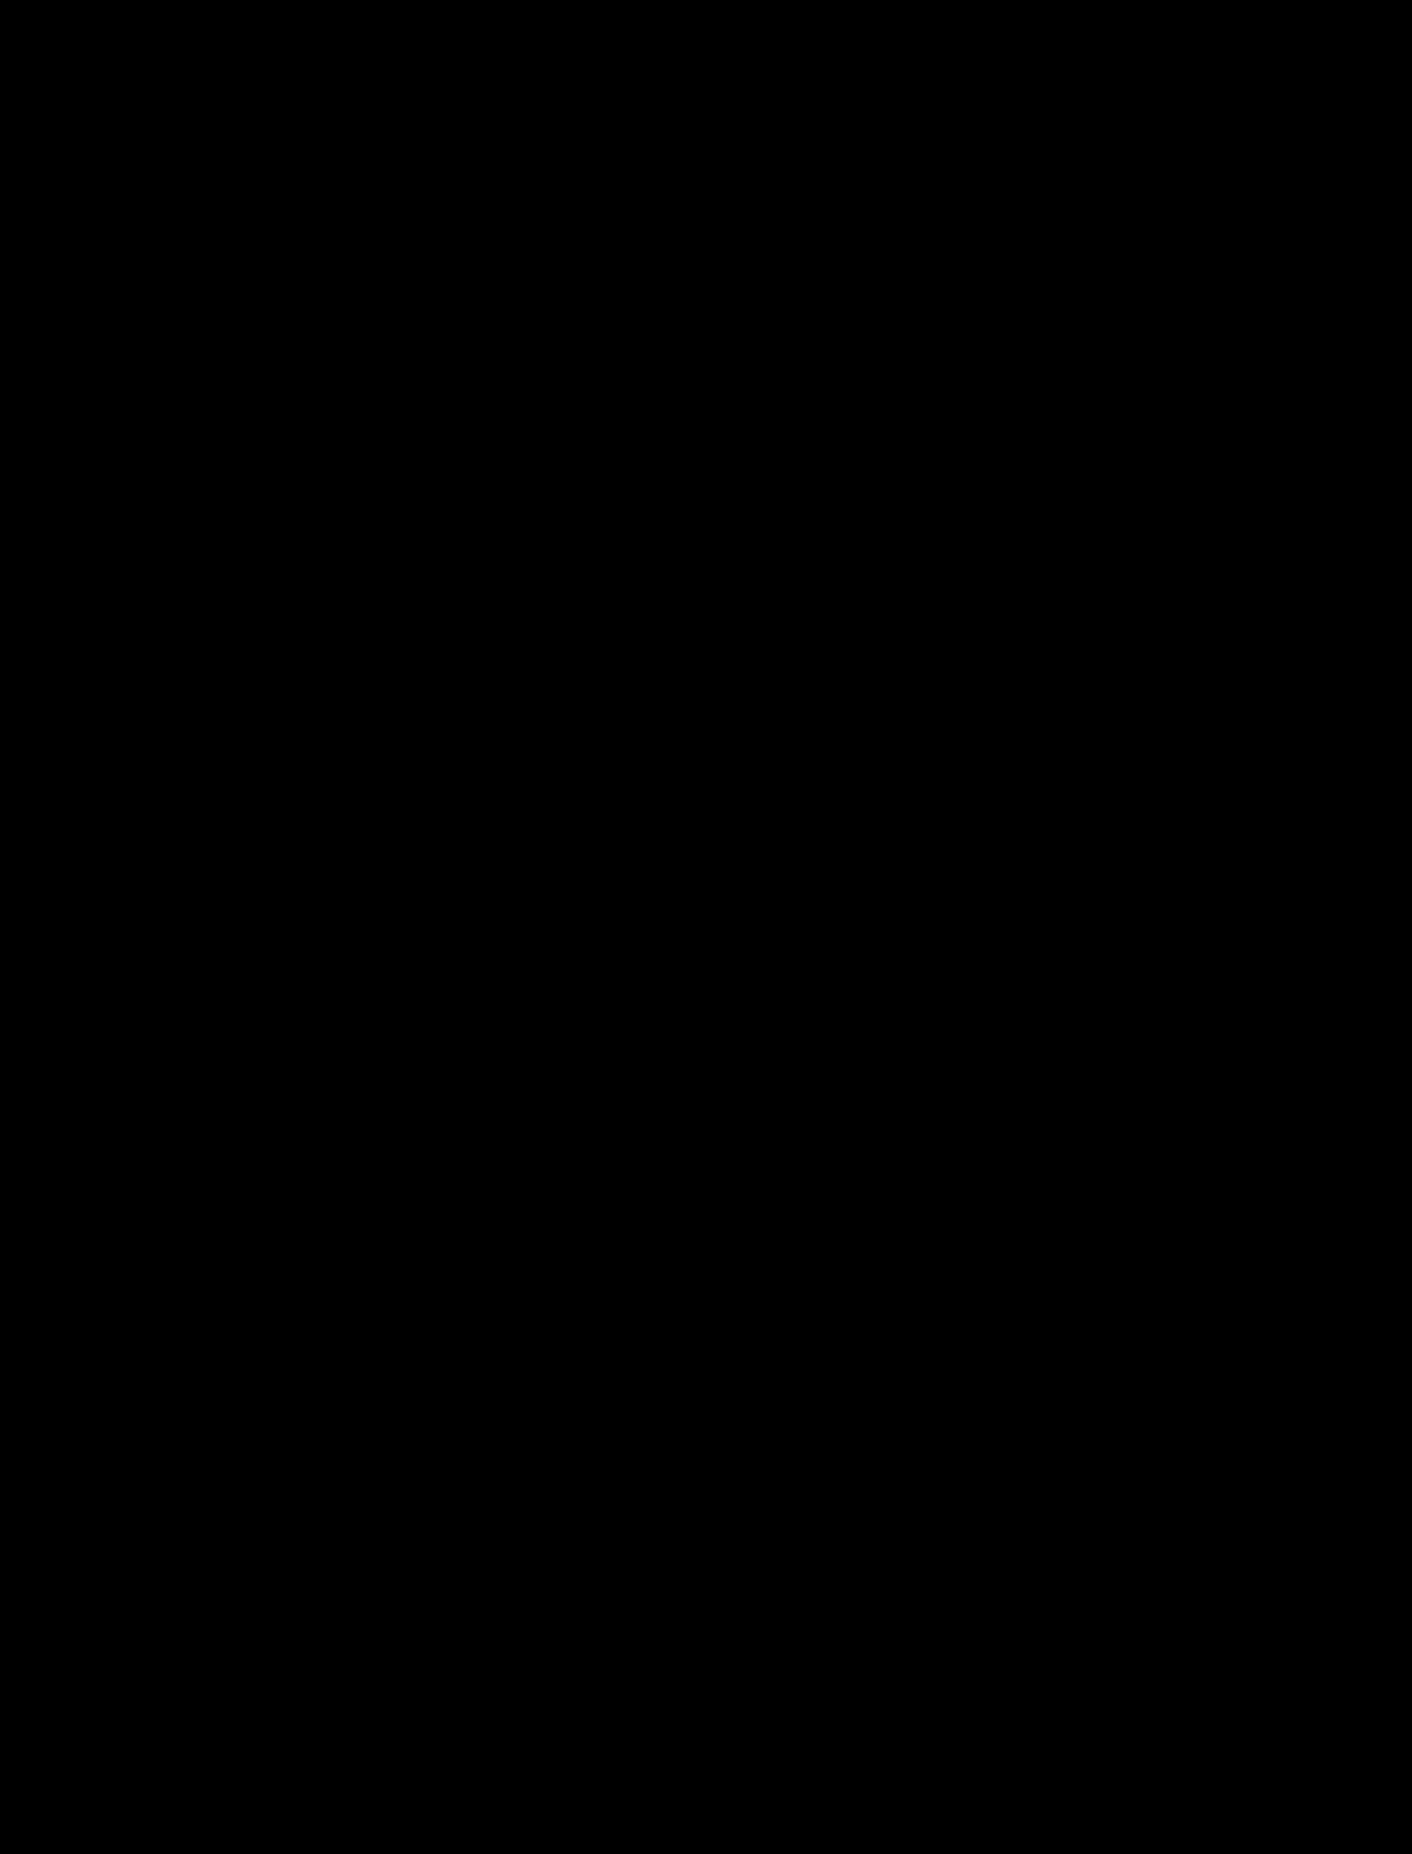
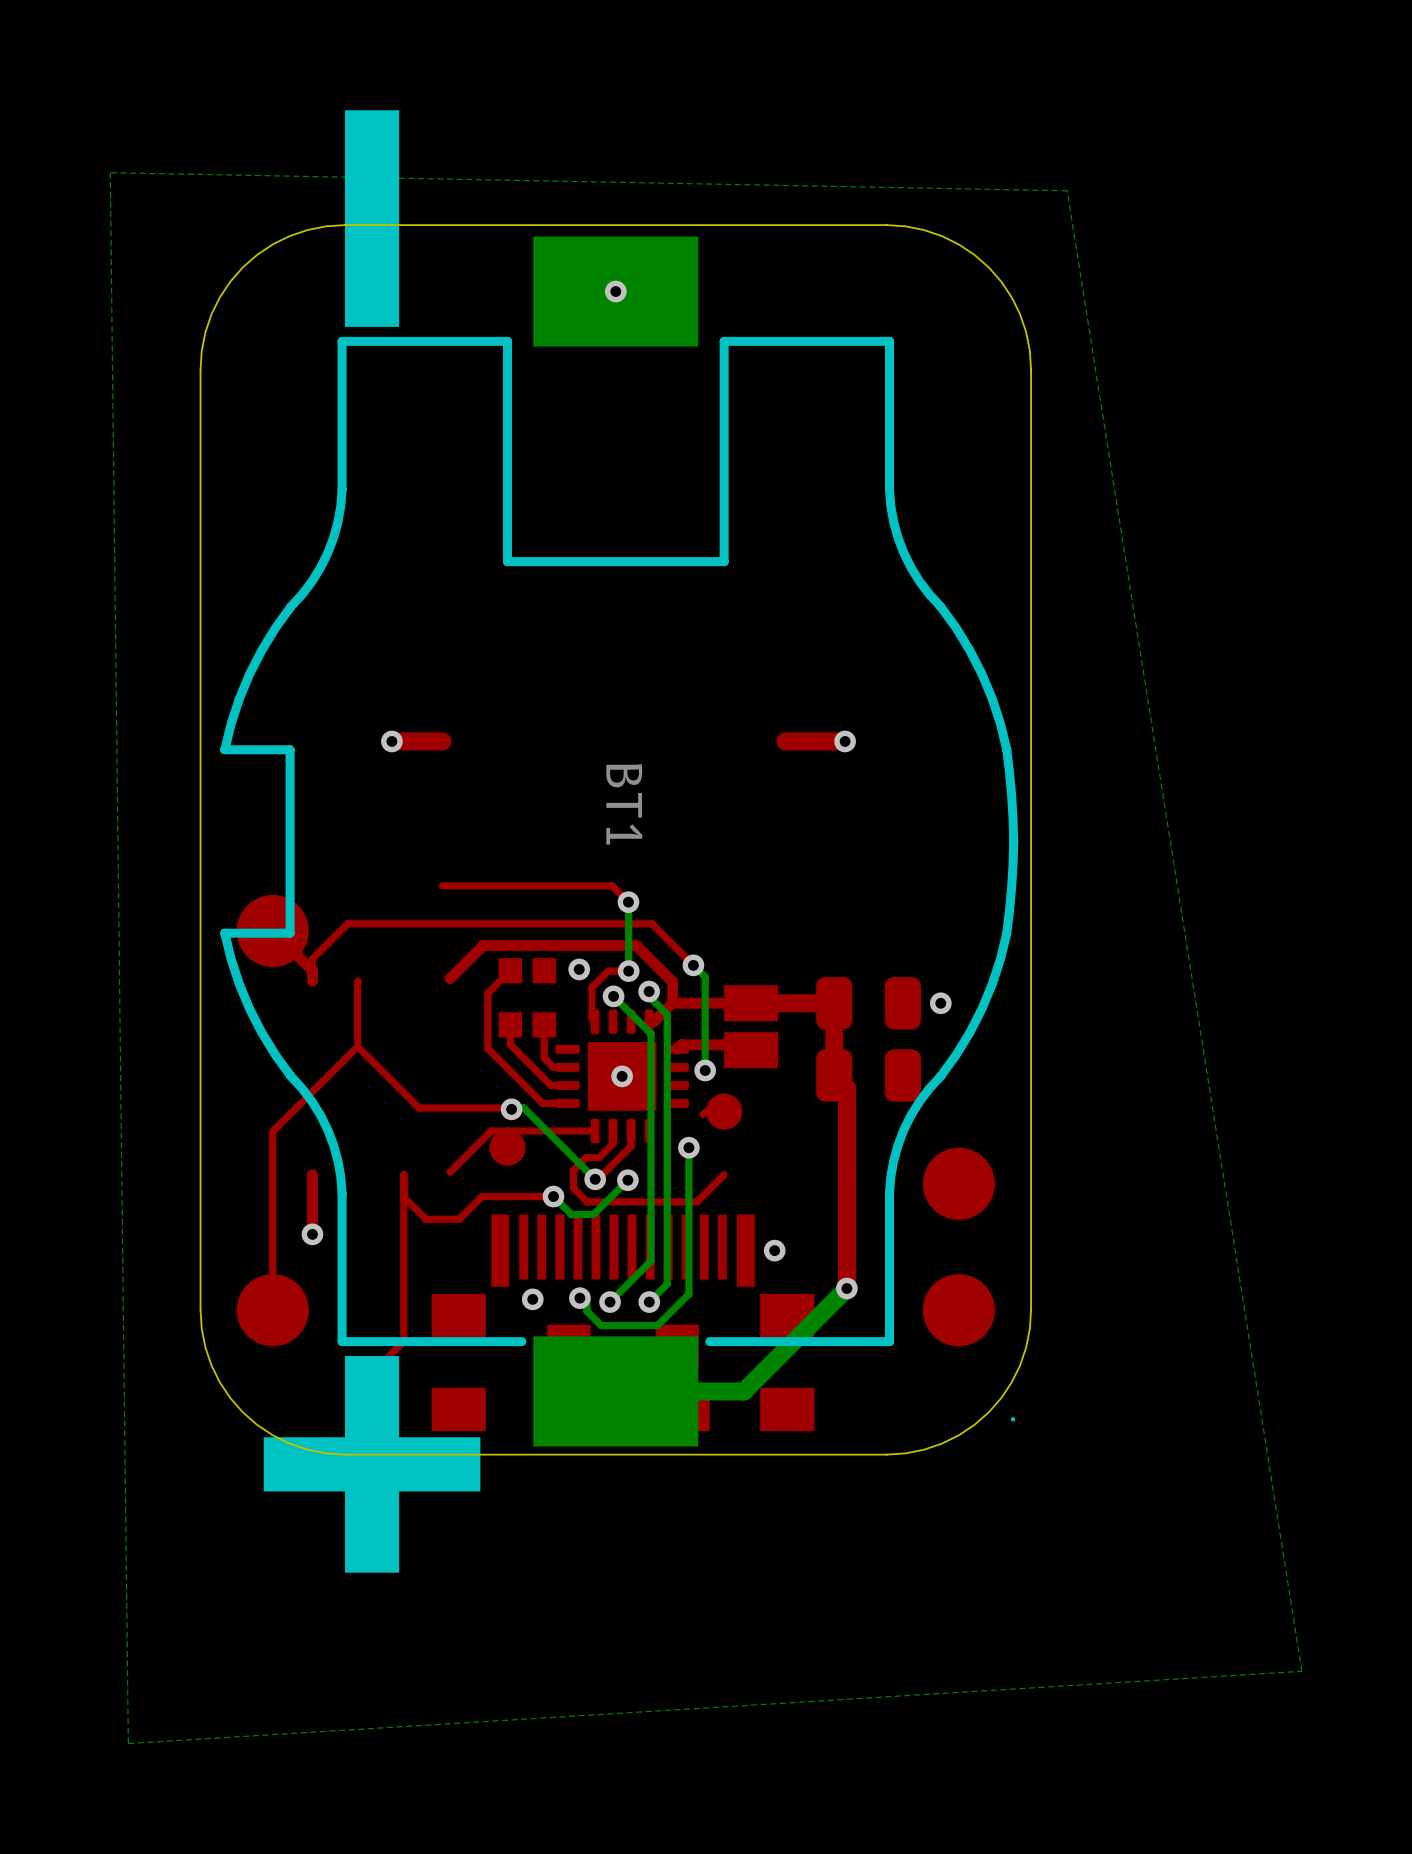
bottom zone outline: none -> (110, 172) (1067, 190) (1301, 1671) (128, 1743) (110, 172)
board edge: none -> (886, 225) (326, 226) (307, 230) (272, 244) (242, 267) (219, 297) (205, 332) (200, 369) (200, 1310) (205, 1347) (219, 1382) (242, 1412) (272, 1435) (307, 1449) (344, 1454) (905, 1453) (924, 1449) (958, 1435) (988, 1412) (1011, 1382) (1026, 1347) (1031, 1310) (1029, 350) (1020, 314) (1011, 297) (988, 267) (974, 254) (941, 236) (924, 230) (886, 225)
via: none -> (615, 291)
via: none -> (391, 741)
top track: none -> (442, 741) (391, 741)
top track: none -> (845, 741) (785, 741)
via: none -> (845, 741)
BT1: none -> (619, 841)
top track: none -> (442, 885) (612, 885) (628, 902)
bottom track: none -> (628, 902) (628, 971)
via: none -> (628, 902)
top track: none -> (272, 931) (312, 970) (312, 981) (312, 958) (347, 923) (651, 923) (693, 965)
part: none -> (272, 931)
bottom track: none -> (693, 965) (705, 977) (705, 1070)
via: none -> (693, 965)
via: none -> (579, 969)
top track: none -> (628, 971) (608, 971) (591, 987) (591, 1018) (595, 1021)
via: none -> (628, 971)
top track: none -> (510, 977) (510, 970) (487, 993) (487, 1048) (542, 1103) (567, 1103)
top track: none -> (450, 978) (483, 945) (636, 945) (672, 981) (672, 1002) (653, 1021) (649, 1021)
top track: none -> (358, 981) (357, 1046)
bottom track: none -> (649, 991) (649, 996) (667, 1014) (667, 1284) (649, 1302)
via: none -> (649, 991)
bottom track: none -> (613, 996) (651, 1033) (651, 1261) (610, 1302)
via: none -> (613, 996)
part: none -> (527, 997)
top track: none -> (672, 1003) (834, 1003) (834, 1075) (846, 1088) (846, 1288)
part: none -> (868, 1003)
via: none -> (940, 1003)
top track: none -> (510, 1024) (510, 1044) (551, 1085) (567, 1085)
top track: none -> (544, 1024) (544, 1058) (553, 1067) (567, 1067)
part: none -> (751, 1026)
top track: none -> (357, 1046) (419, 1107) (511, 1109)
top track: none -> (357, 1046) (272, 1131) (272, 1310)
top track: none -> (676, 1049) (681, 1044) (745, 1044) (751, 1050)
via: none -> (705, 1070)
part: none -> (868, 1075)
part: none -> (622, 1076)
via: none -> (622, 1076)
bottom track: none -> (511, 1109) (523, 1107) (595, 1179)
via: none -> (511, 1109)
top track: none -> (706, 1111) (702, 1114)
part: none -> (724, 1111)
top track: none -> (595, 1131) (491, 1131) (450, 1172)
top track: none -> (613, 1131) (613, 1143) (599, 1157) (586, 1157) (573, 1170) (573, 1188) (587, 1201) (697, 1201) (724, 1174)
top track: none -> (631, 1131) (631, 1146) (597, 1179) (595, 1179)
part: none -> (507, 1147)
bottom track: none -> (688, 1147) (688, 1294) (657, 1325) (601, 1325) (586, 1311) (586, 1296)
via: none -> (688, 1147)
top track: none -> (312, 1174) (312, 1234)
top track: none -> (403, 1174) (403, 1341) (363, 1382)
via: none -> (595, 1179)
bottom track: none -> (627, 1180) (593, 1214) (571, 1214) (553, 1196)
via: none -> (627, 1180)
part: none -> (958, 1183)
top track: none -> (553, 1196) (482, 1196) (459, 1219) (426, 1219) (403, 1197)
via: none -> (553, 1196)
via: none -> (312, 1234)
via: none -> (774, 1250)
bottom track: none -> (846, 1288) (743, 1391) (615, 1391)
via: none -> (846, 1288)
via: none -> (579, 1298)
via: none -> (532, 1299)
via: none -> (610, 1302)
via: none -> (649, 1302)
part: none -> (272, 1310)
part: none -> (958, 1310)
part: none -> (623, 1322)

